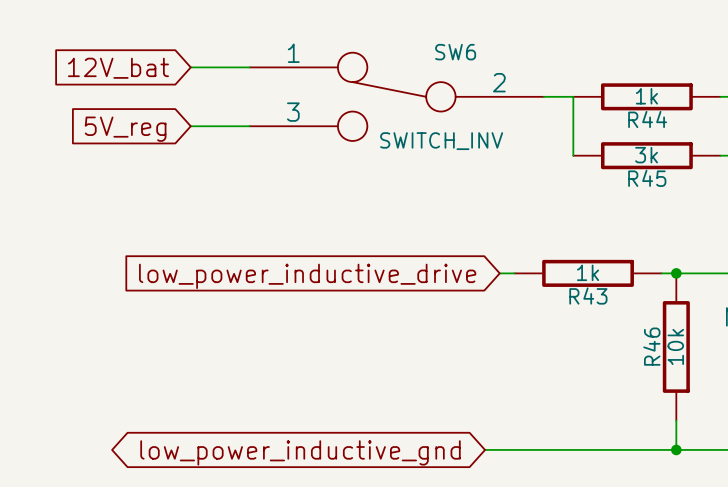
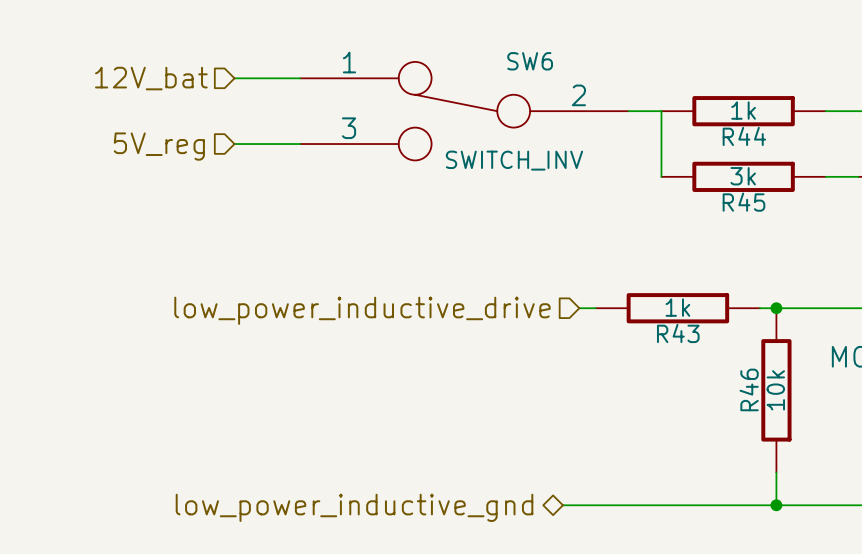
hierarchical label: none -> 12V_bat (151, 78)
global label: 12V_bat (118, 68) -> none
hierarchical label: none -> 5V_reg (159, 146)
global label: 5V_reg (125, 129) -> none
hierarchical label: none -> low_power_inductive_drive (362, 310)
global label: low_power_inductive_drive (307, 276) -> none
hierarchical label: none -> low_power_inductive_gnd (354, 507)
global label: low_power_inductive_gnd (300, 452) -> none

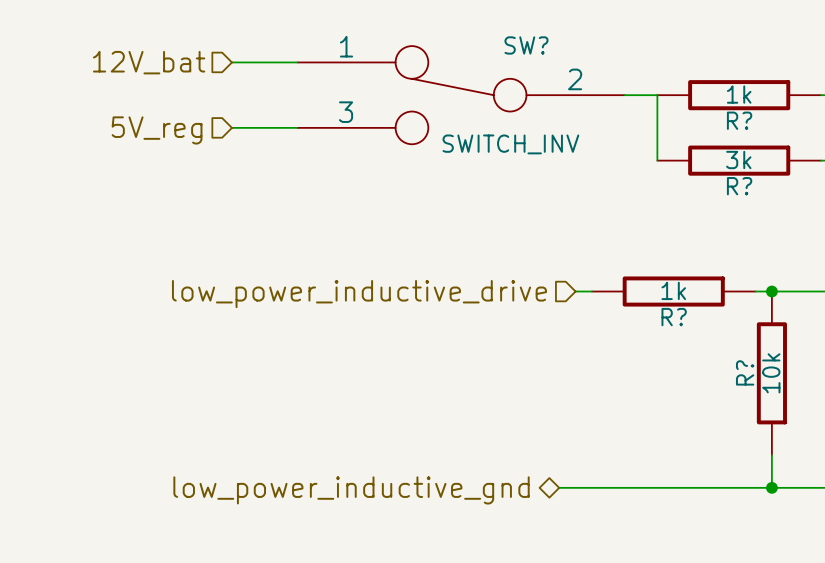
SW6 name: SW6 (530, 61) -> SW? (526, 45)
R44 name: R44 (744, 136) -> R? (739, 120)
R45 name: R45 (743, 202) -> R? (739, 186)
R43 name: R43 (678, 333) -> R? (674, 317)
R46 name: R46 (749, 389) -> R? (745, 372)

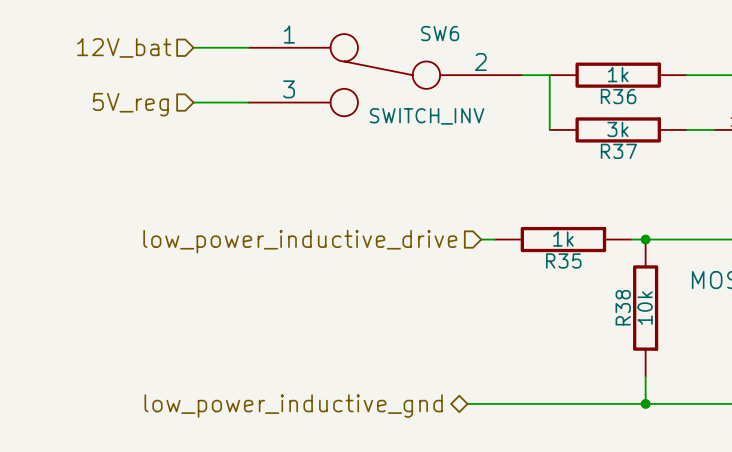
SW? name: SW? (526, 45) -> SW6 (440, 33)
R? name: R? (739, 120) -> R36 (618, 96)
R? name: R? (739, 186) -> R37 (618, 151)
R? name: R? (674, 317) -> R35 (563, 260)
R? name: R? (745, 372) -> R38 (623, 307)

